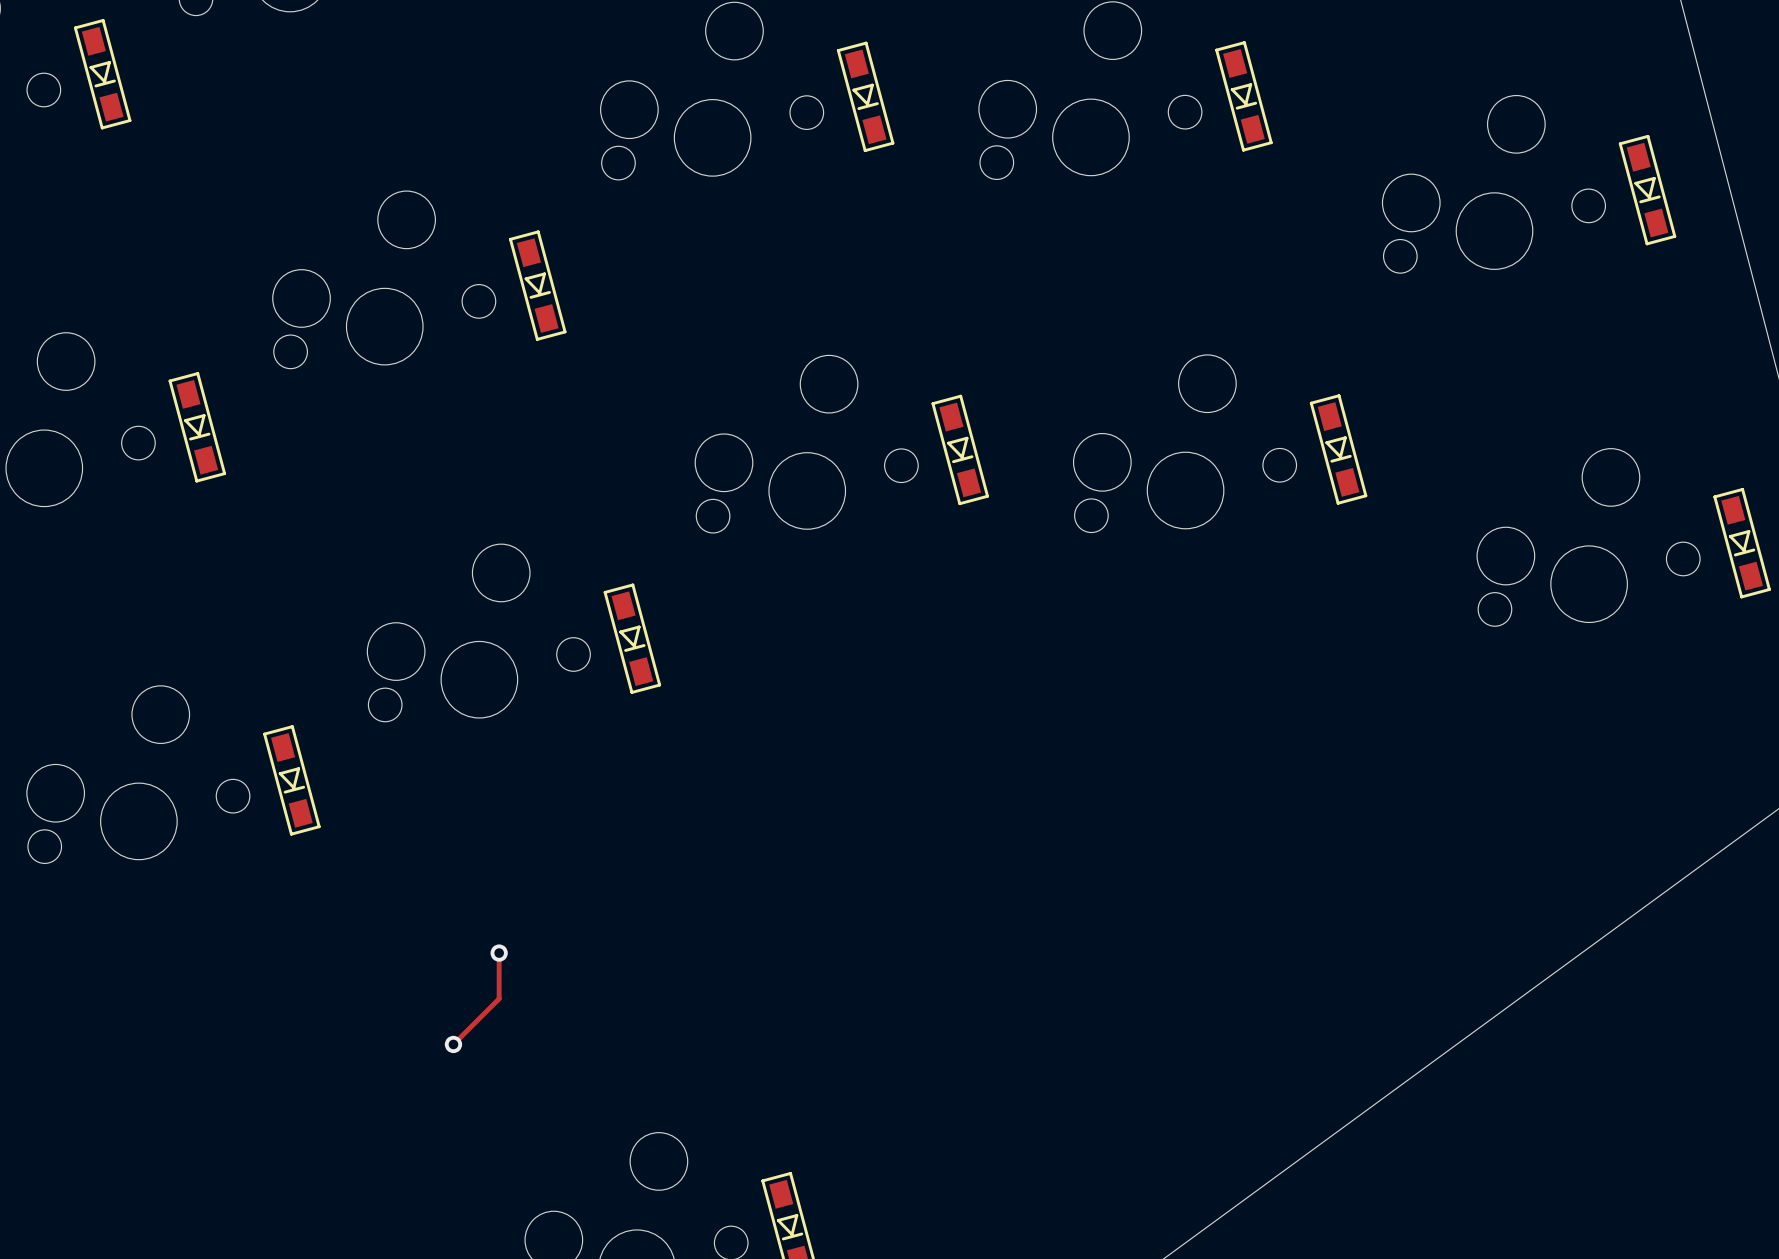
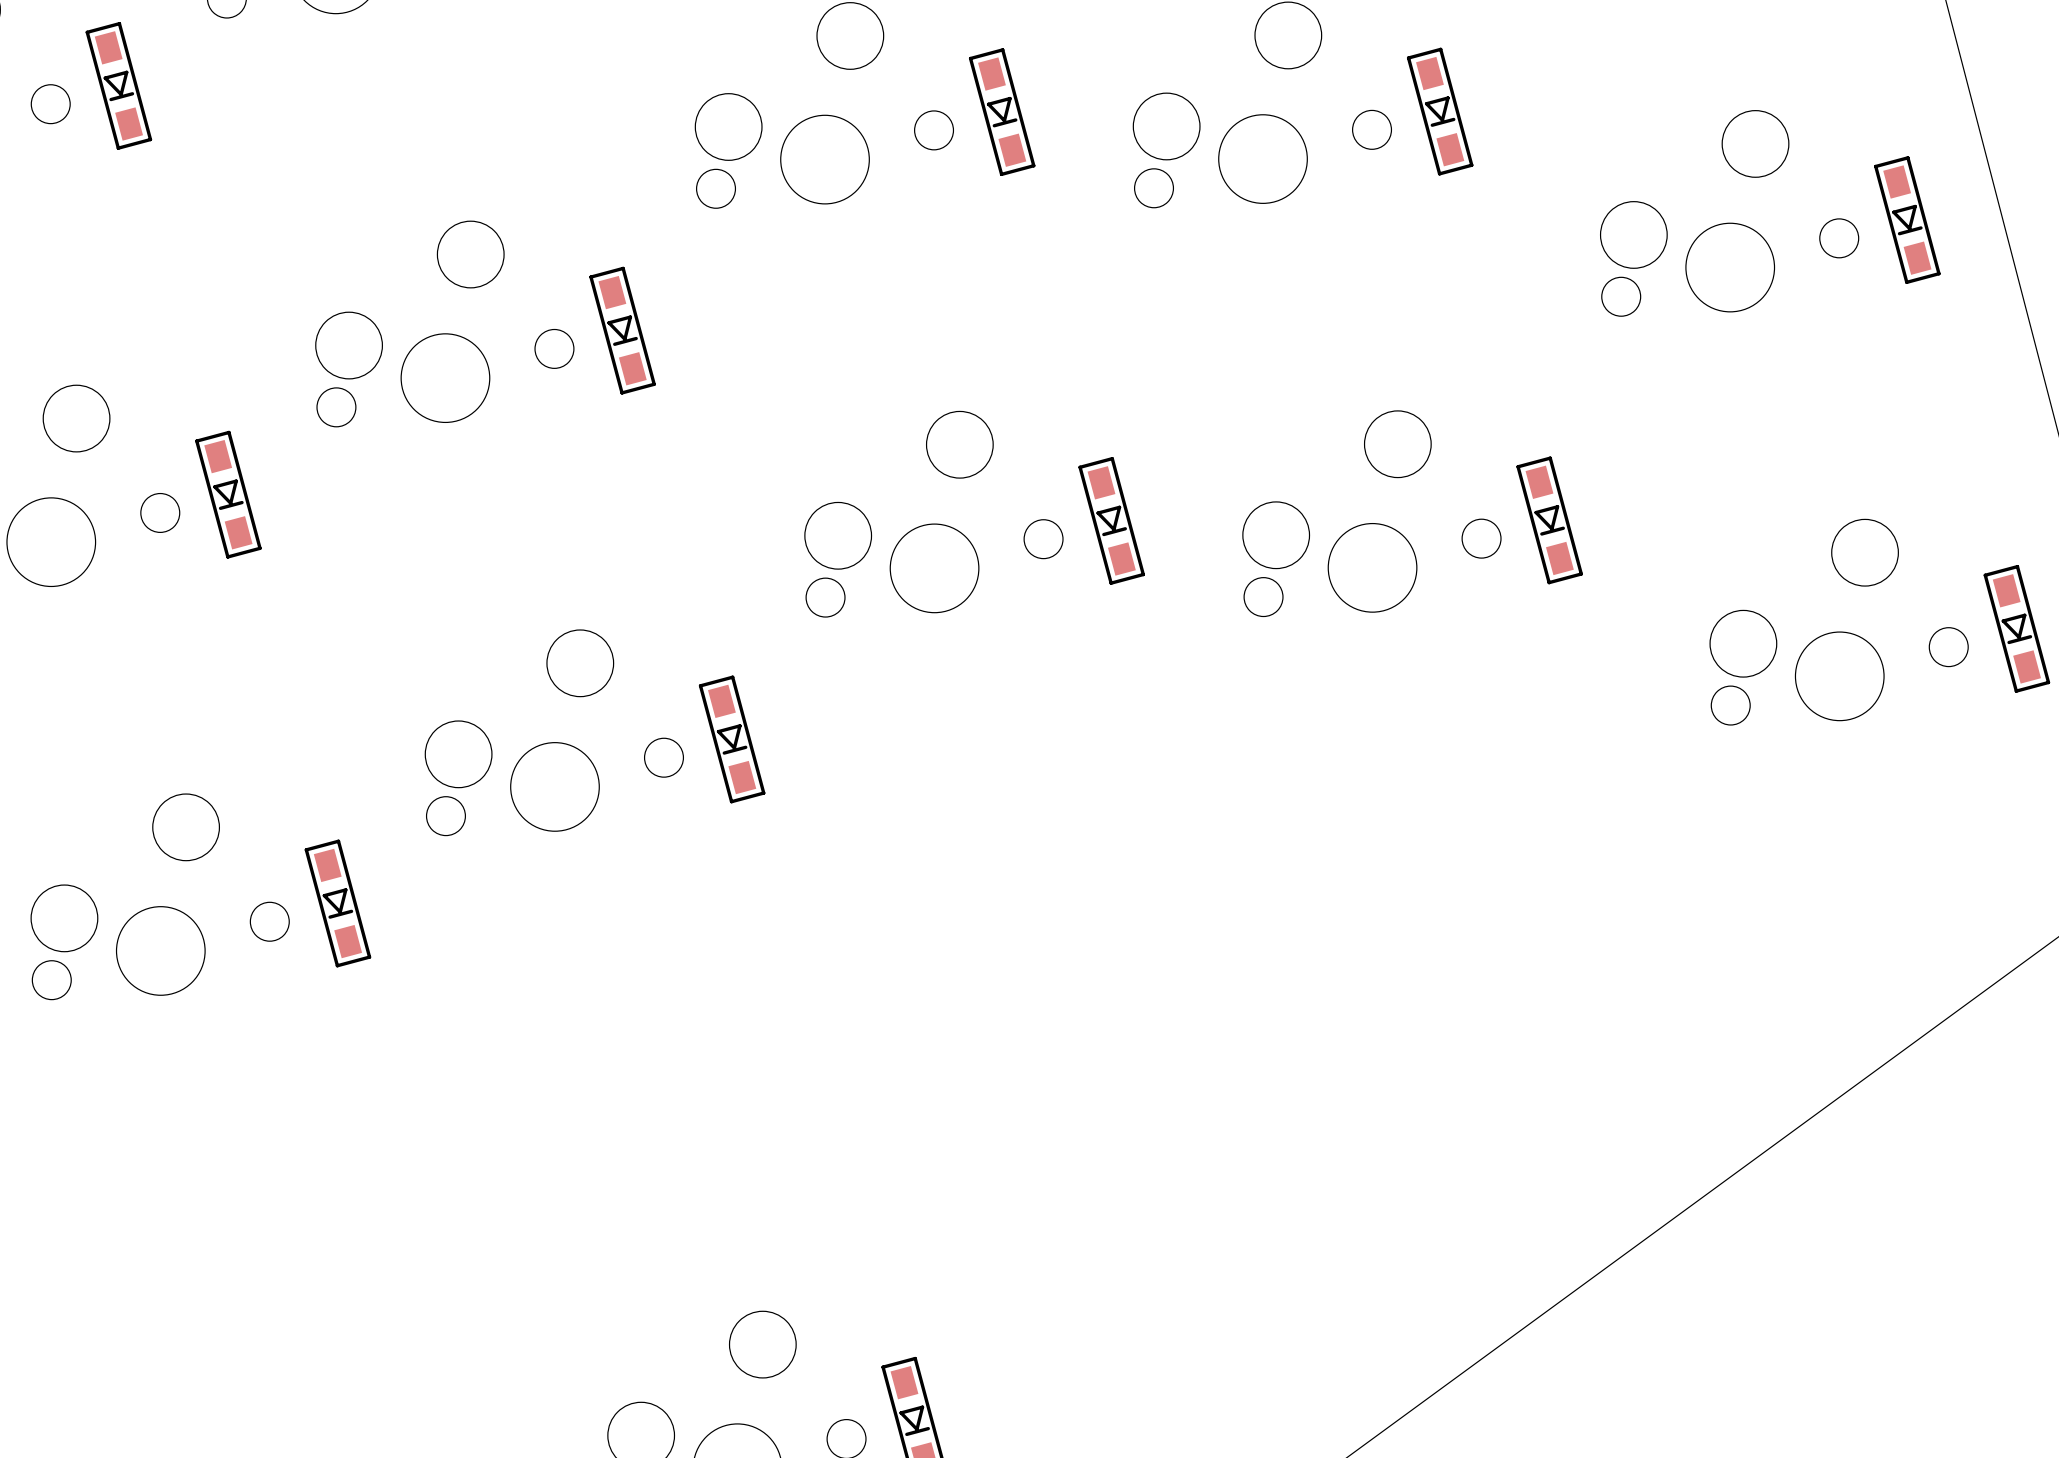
track: (499, 953) (499, 998) (453, 1044) -> none
via: (499, 953) -> none
via: (453, 1044) -> none

